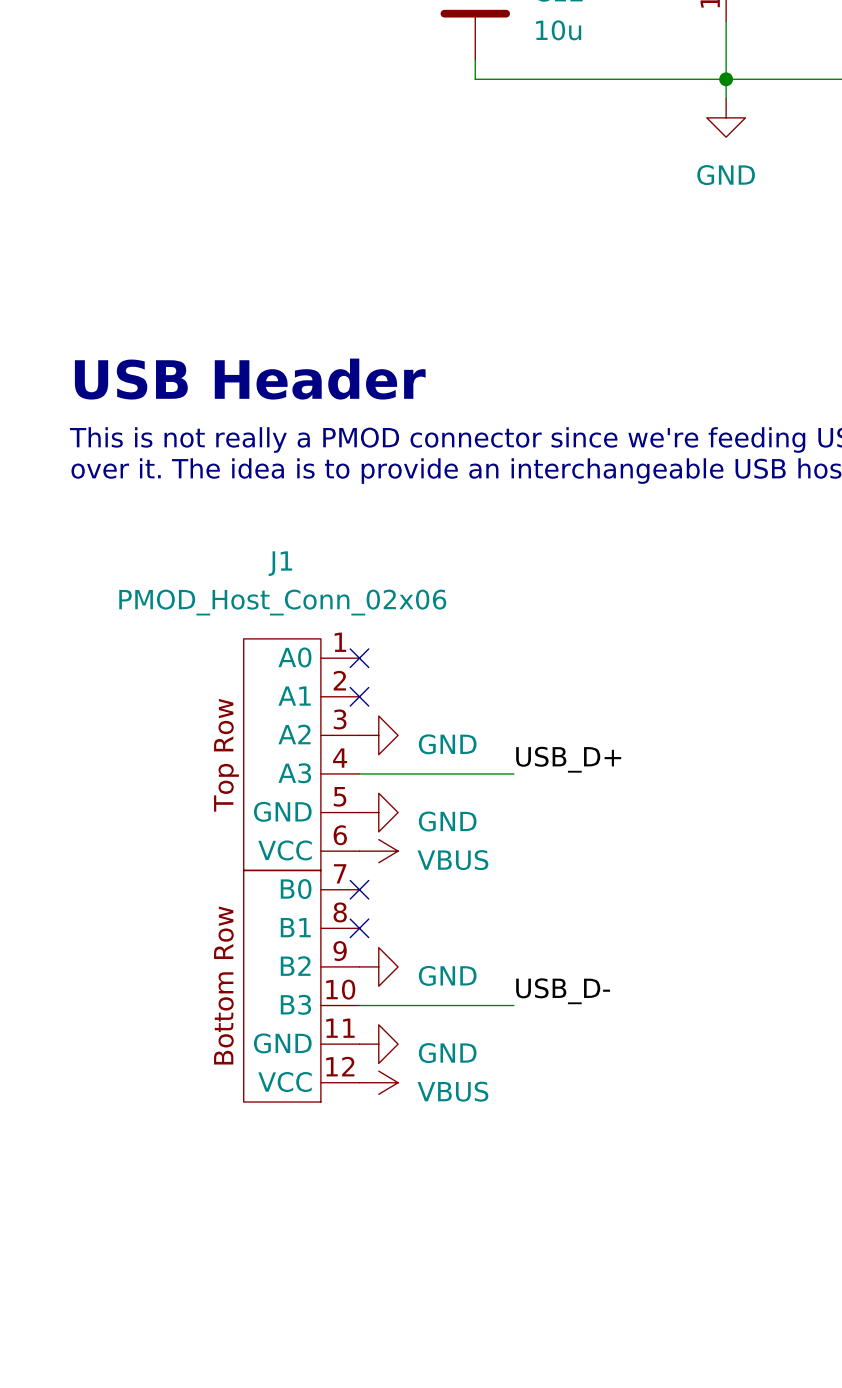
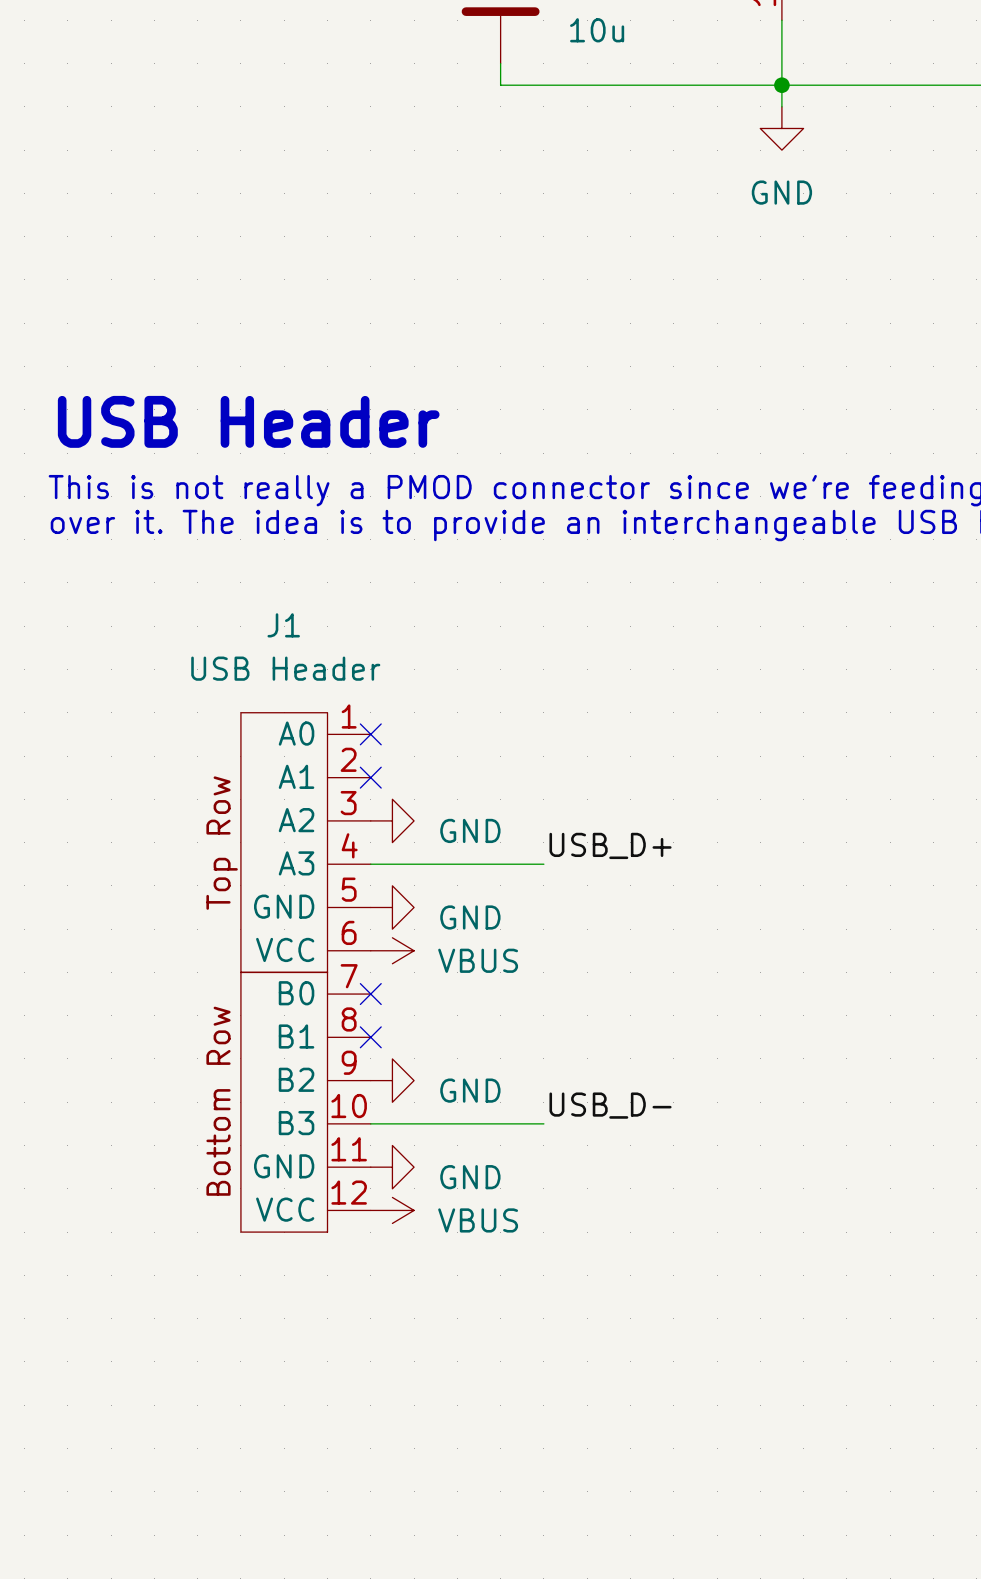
J1 value: PMOD_Host_Conn_02x06 (282, 602) -> USB Header (285, 668)

